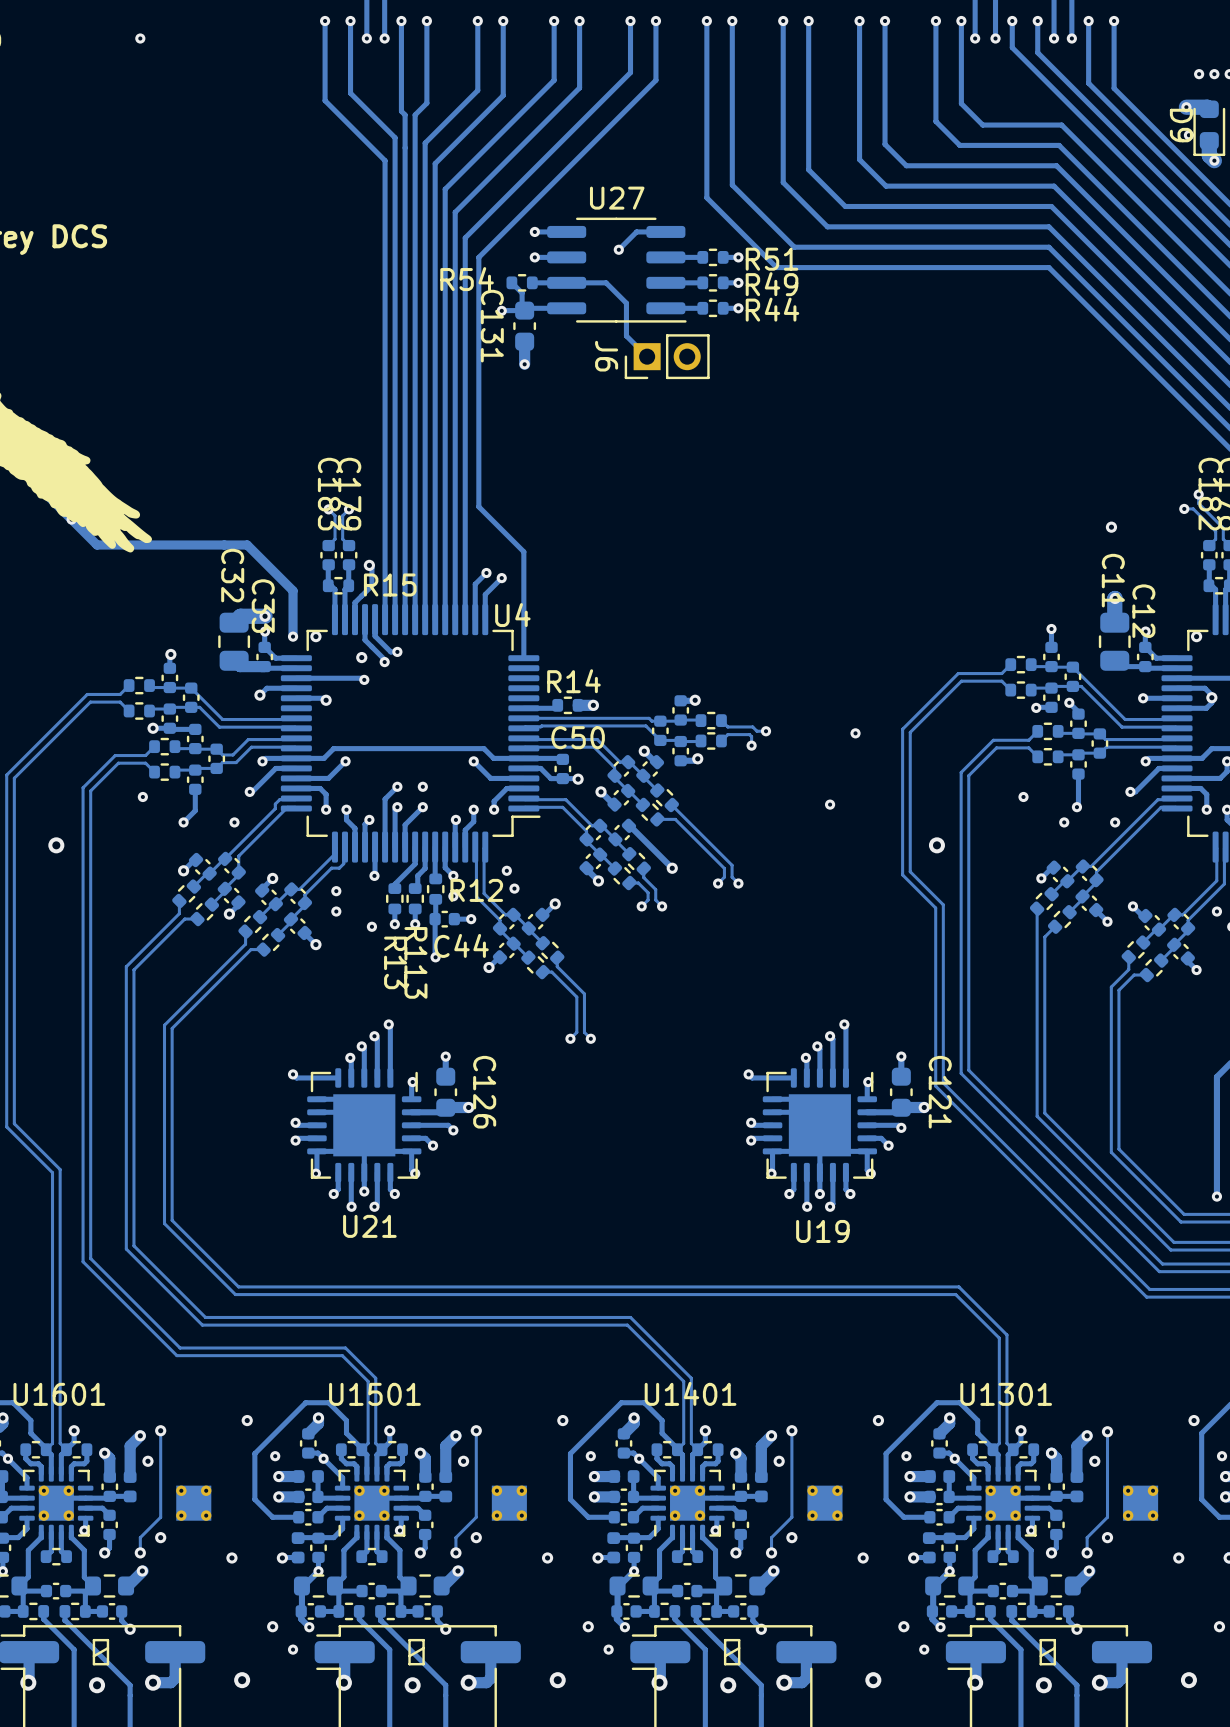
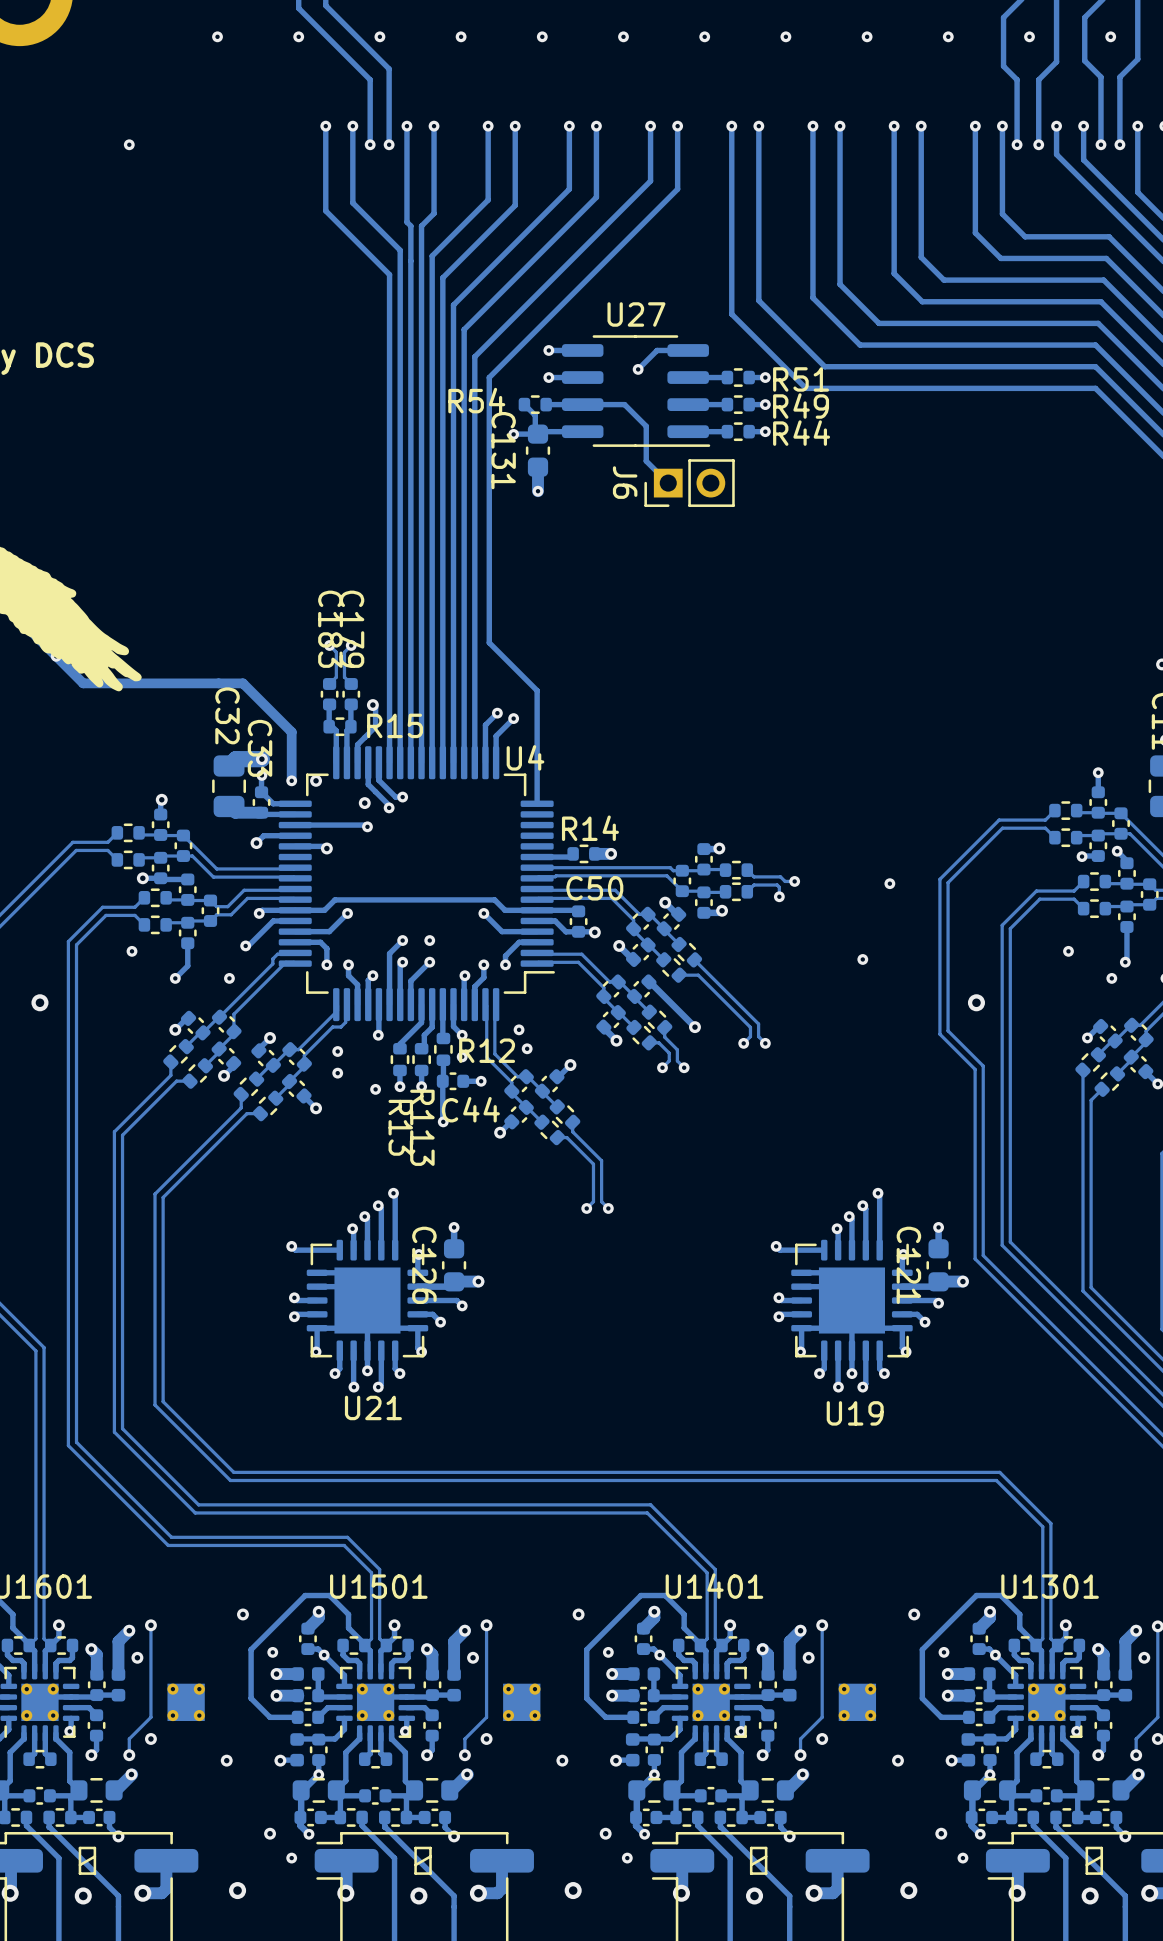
C126 name position: C126 (484, 1092) -> C126 (424, 1265)
C121 name position: C121 (940, 1092) -> C121 (908, 1265)

